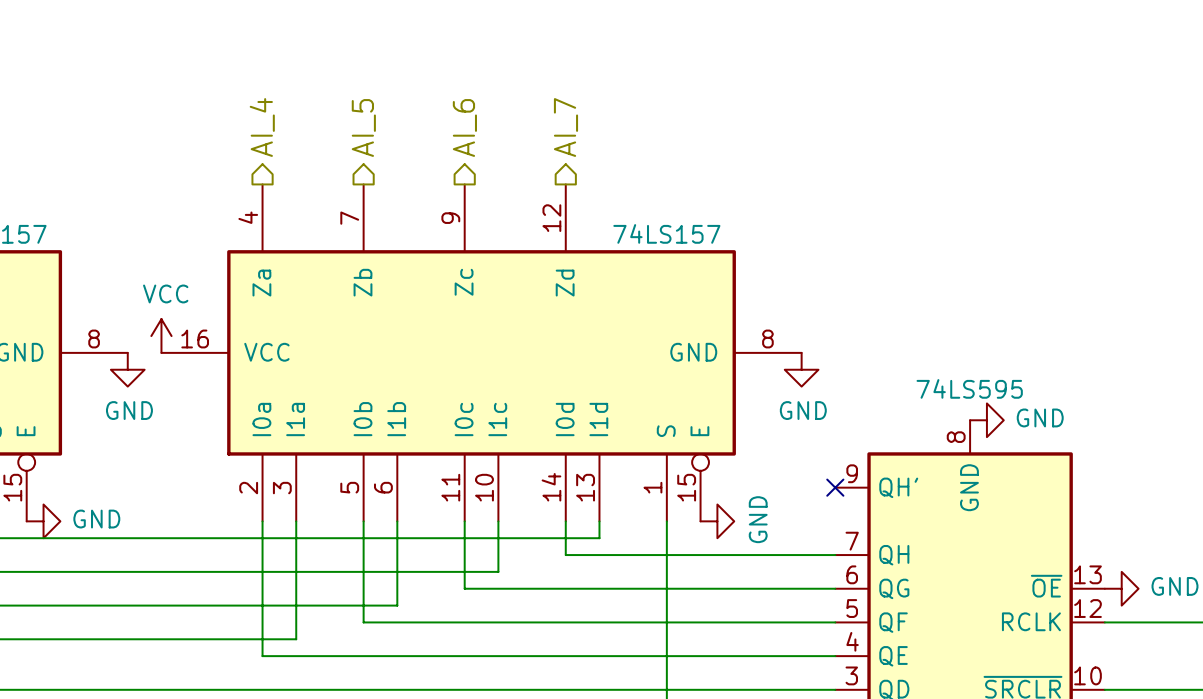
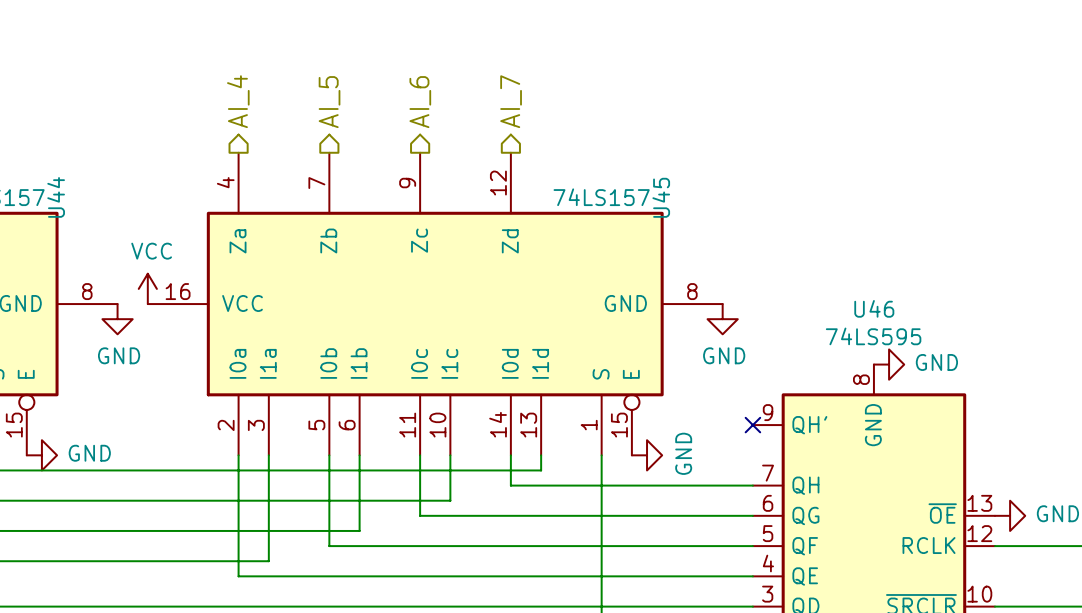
U44 name: none -> U44 (56, 197)
U45 name: none -> U45 (661, 197)
U46 name: none -> U46 (874, 308)

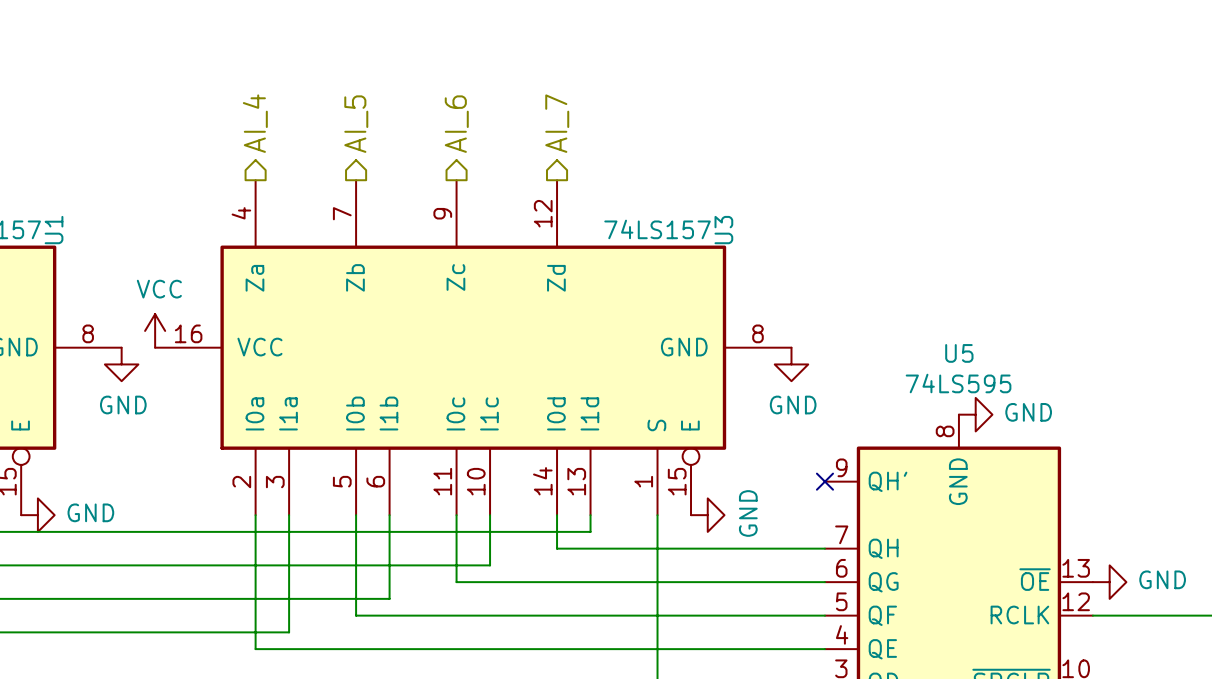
U44 name: U44 (56, 197) -> U1 (54, 230)
U45 name: U45 (661, 197) -> U3 (723, 230)
U46 name: U46 (874, 308) -> U5 (959, 353)

